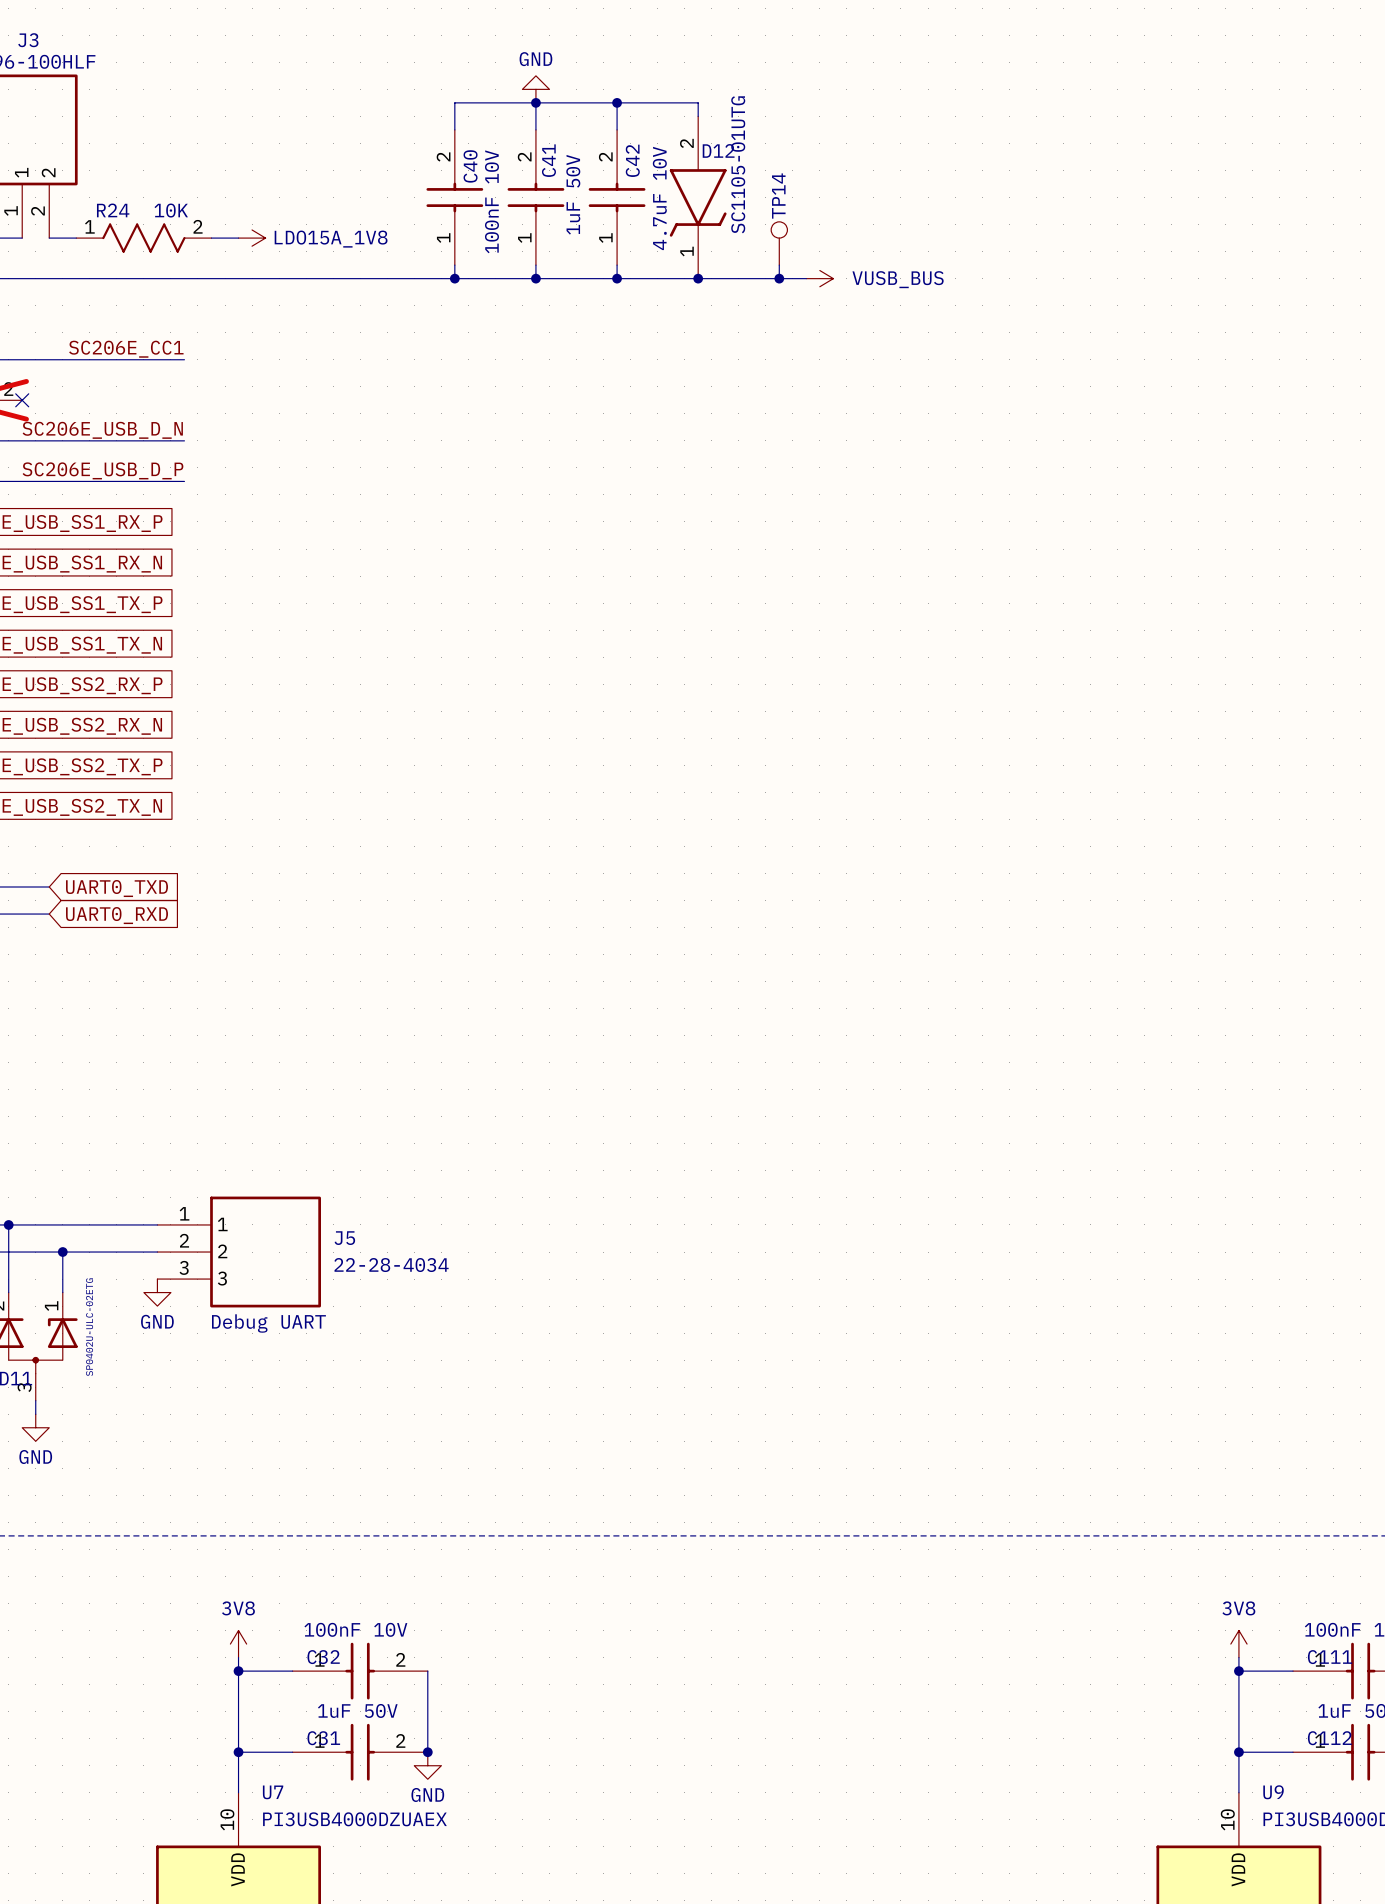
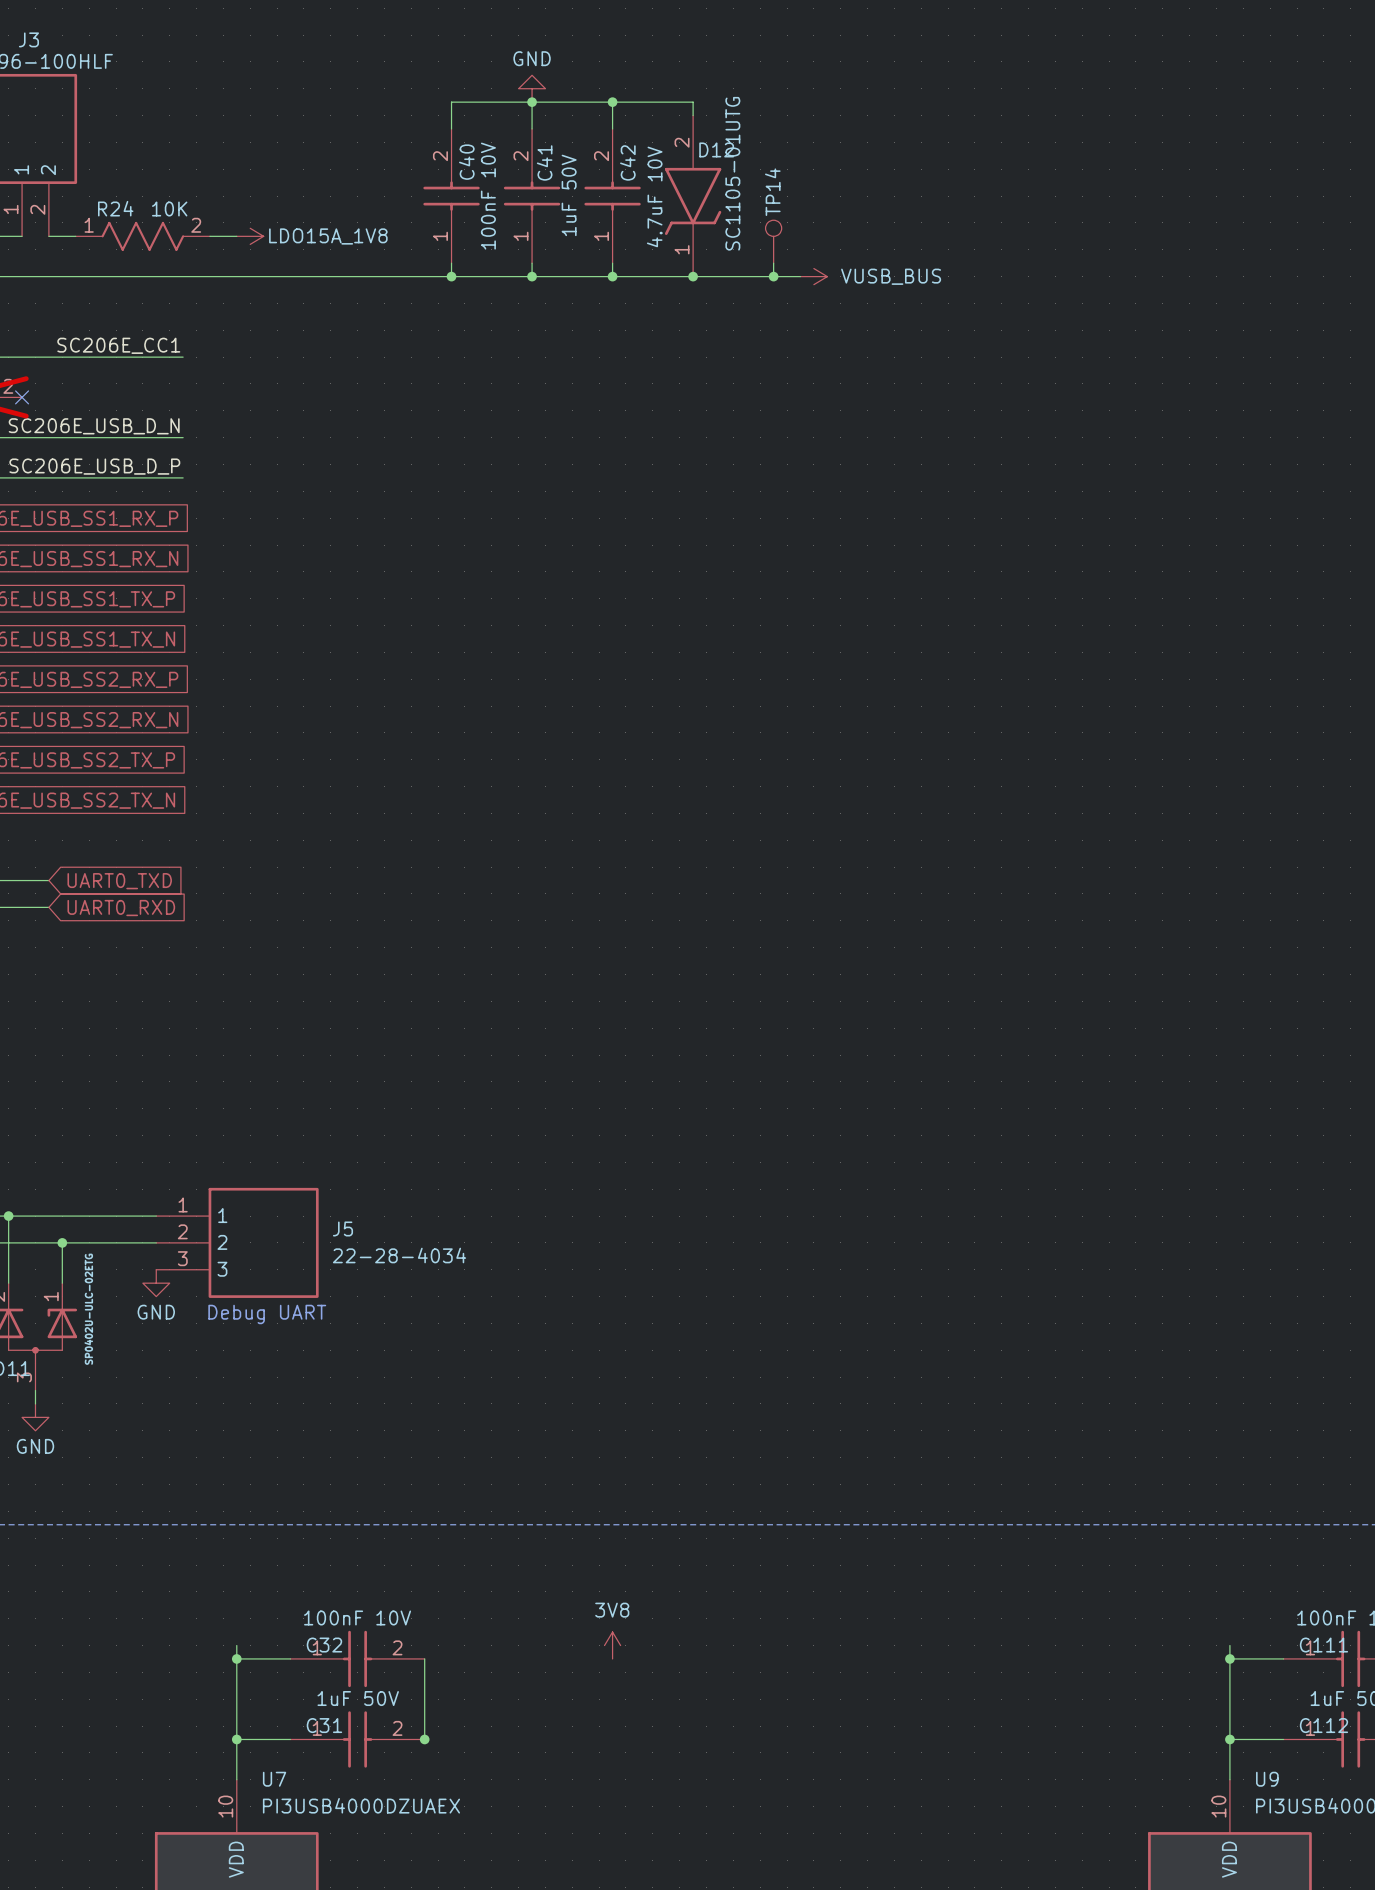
power symbol: 3V8 (238, 1644) -> none
power symbol: 3V8 (1238, 1644) -> none
power symbol: none -> 3V8 (612, 1645)
power symbol: GND (427, 1765) -> none

